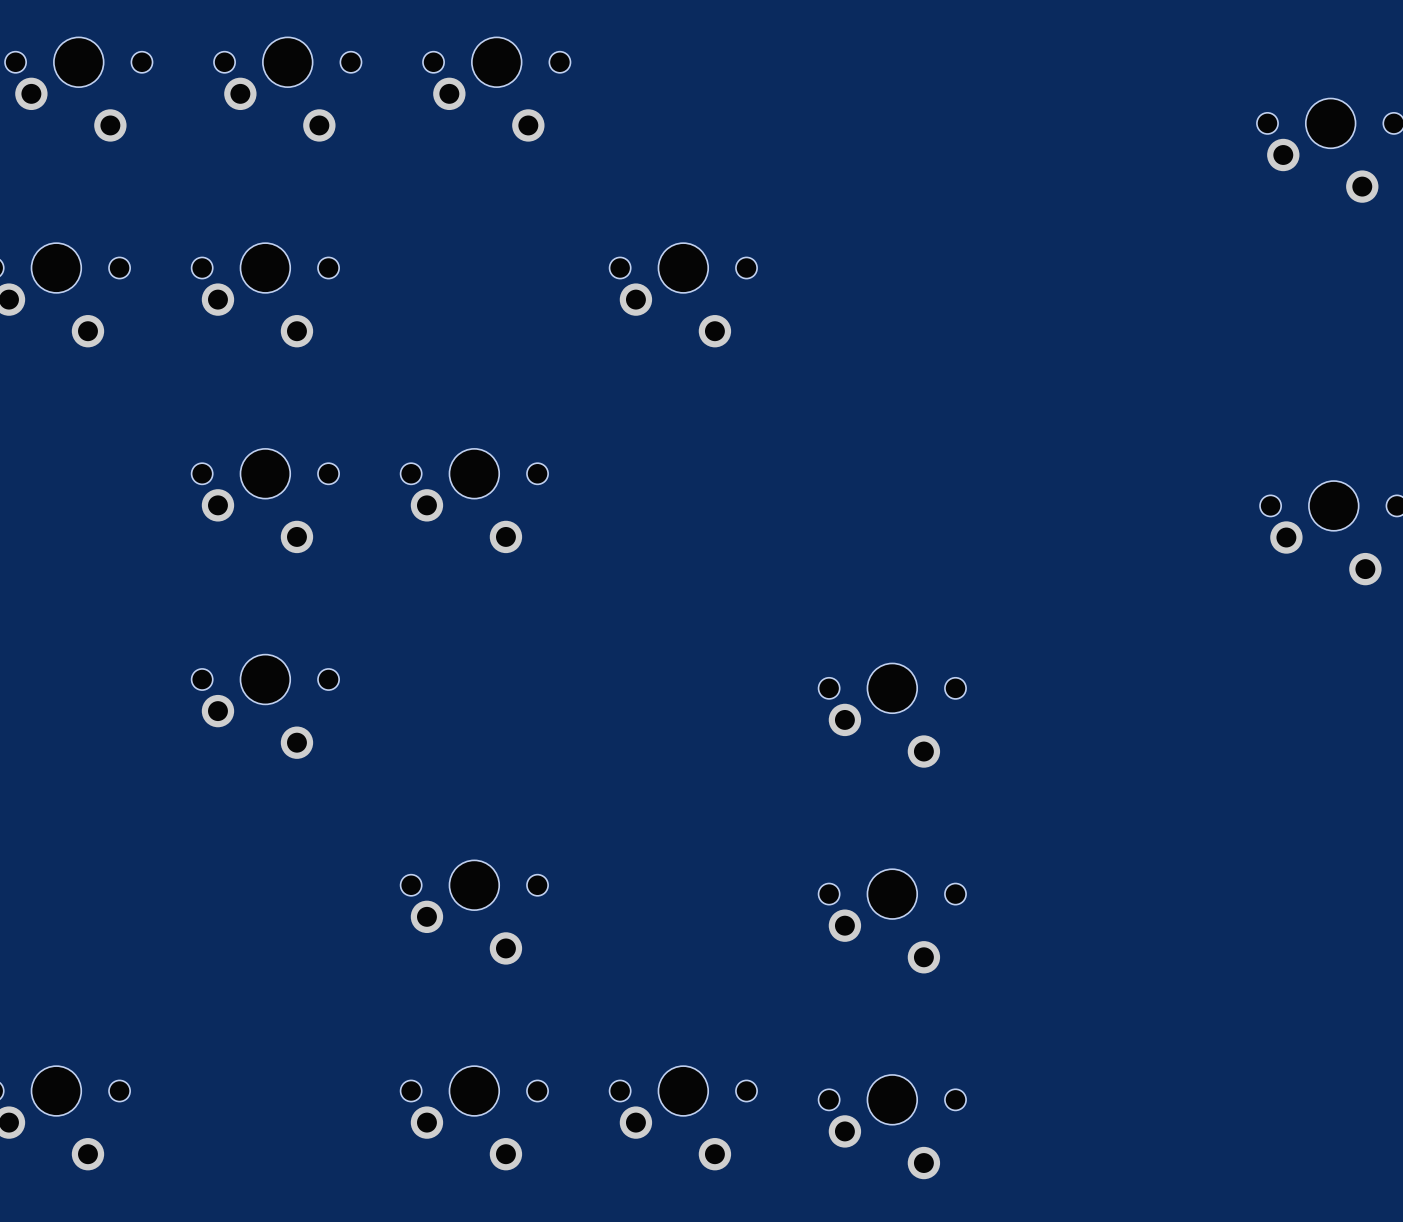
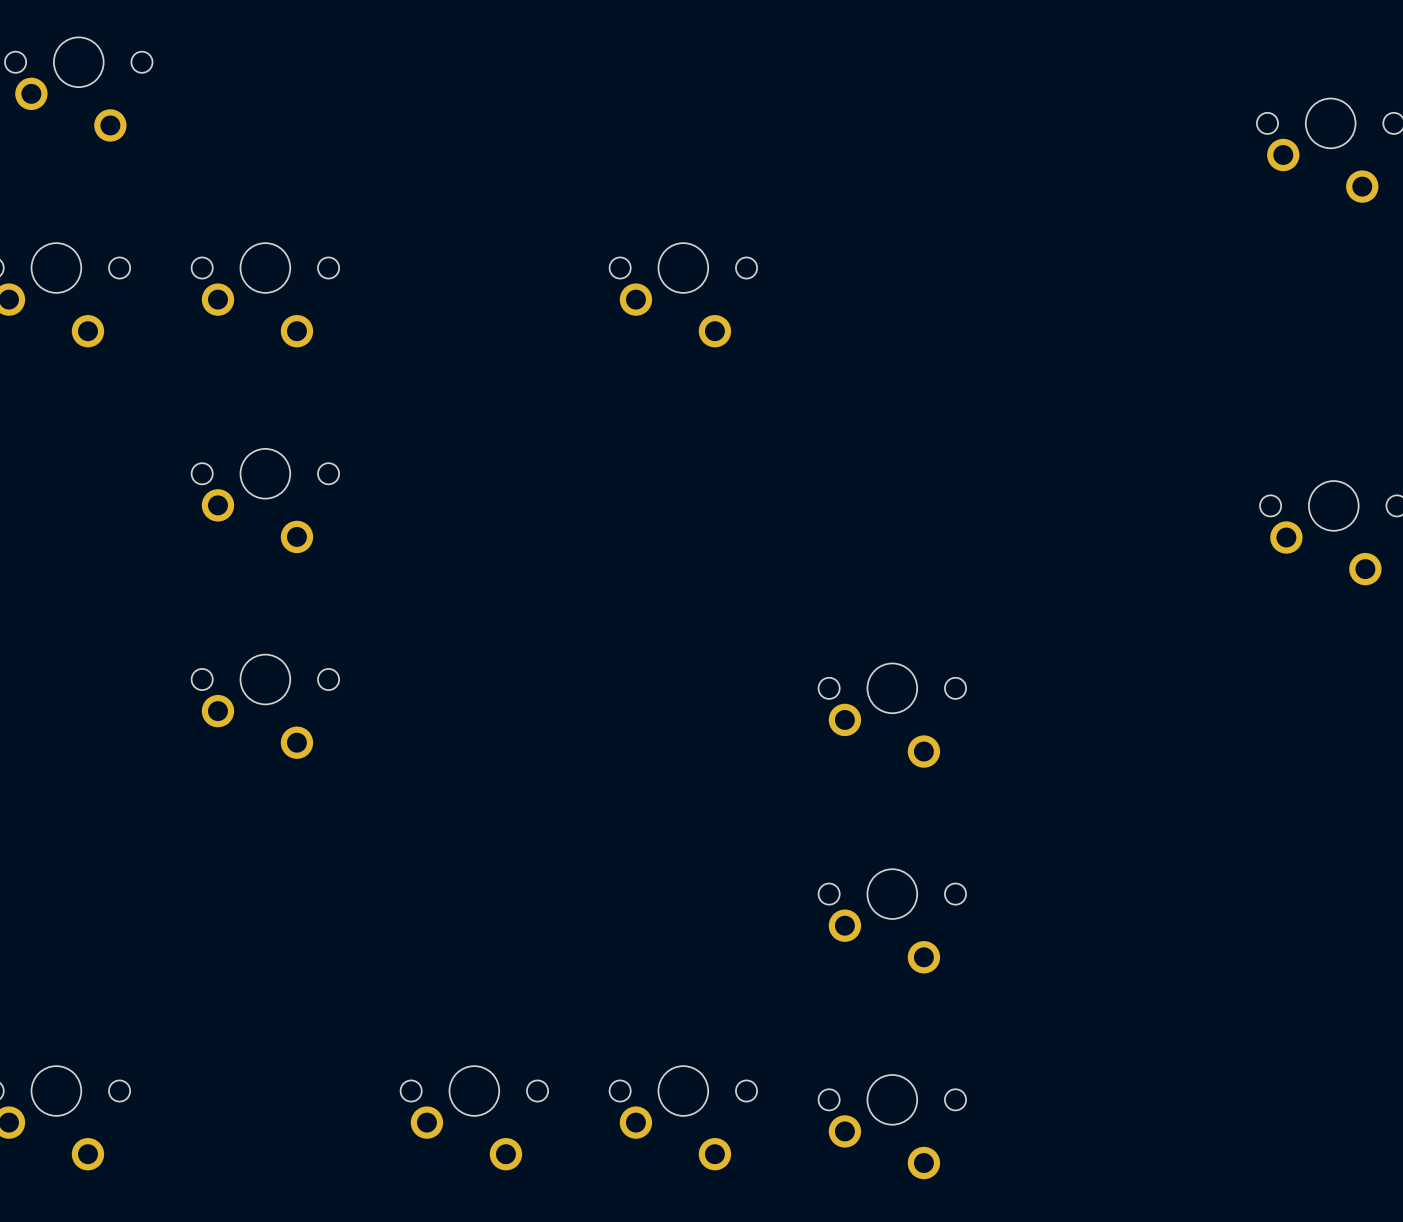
part: (287, 89) -> none
part: (496, 89) -> none
part: (474, 500) -> none
part: (474, 912) -> none

